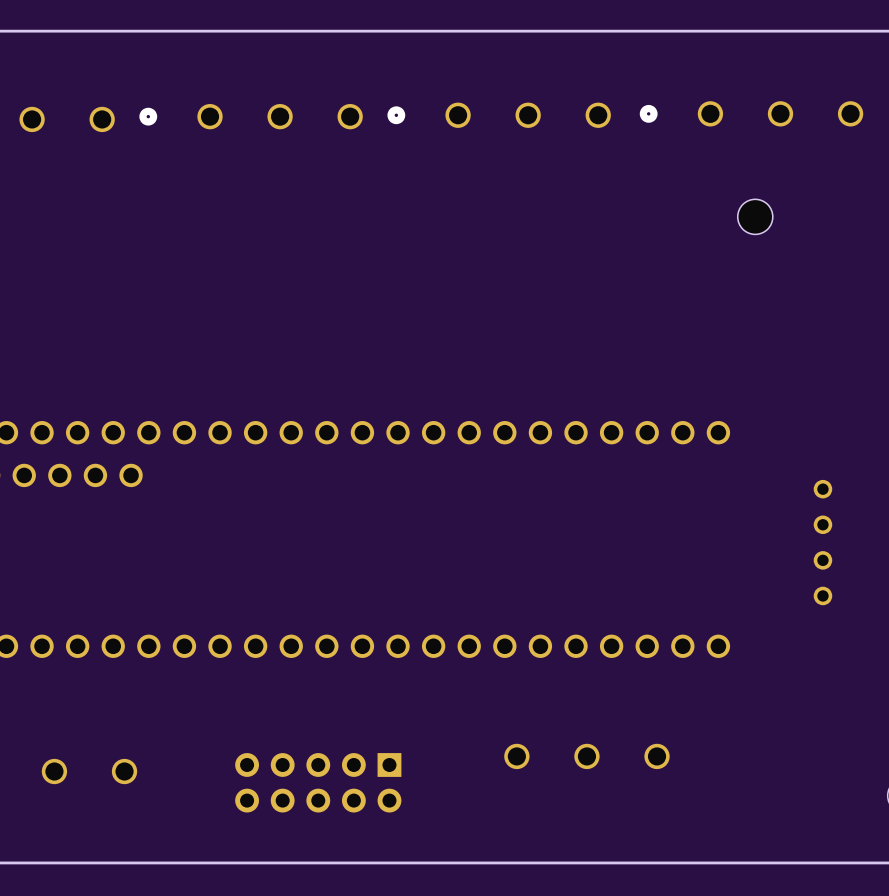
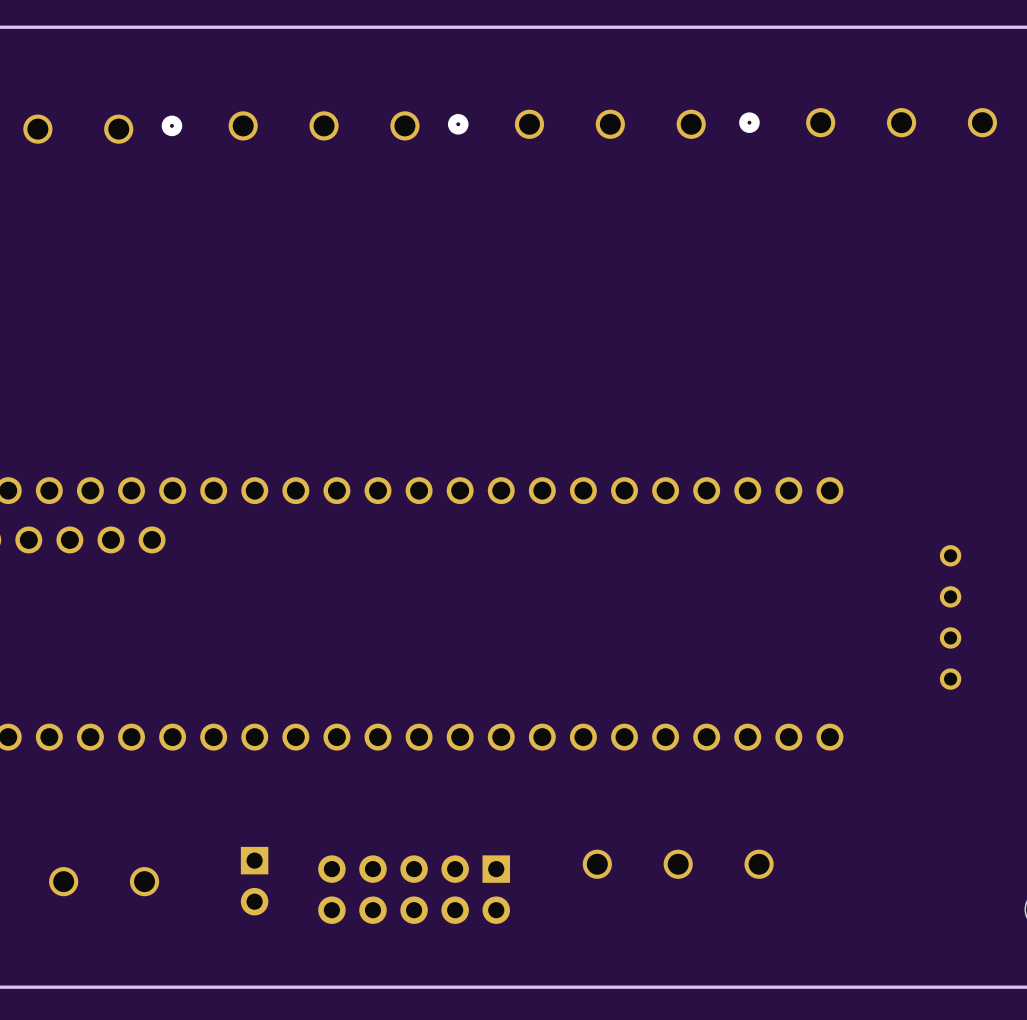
part: (755, 216) -> none
part: none -> (254, 881)
part position: (318, 782) -> (414, 889)

